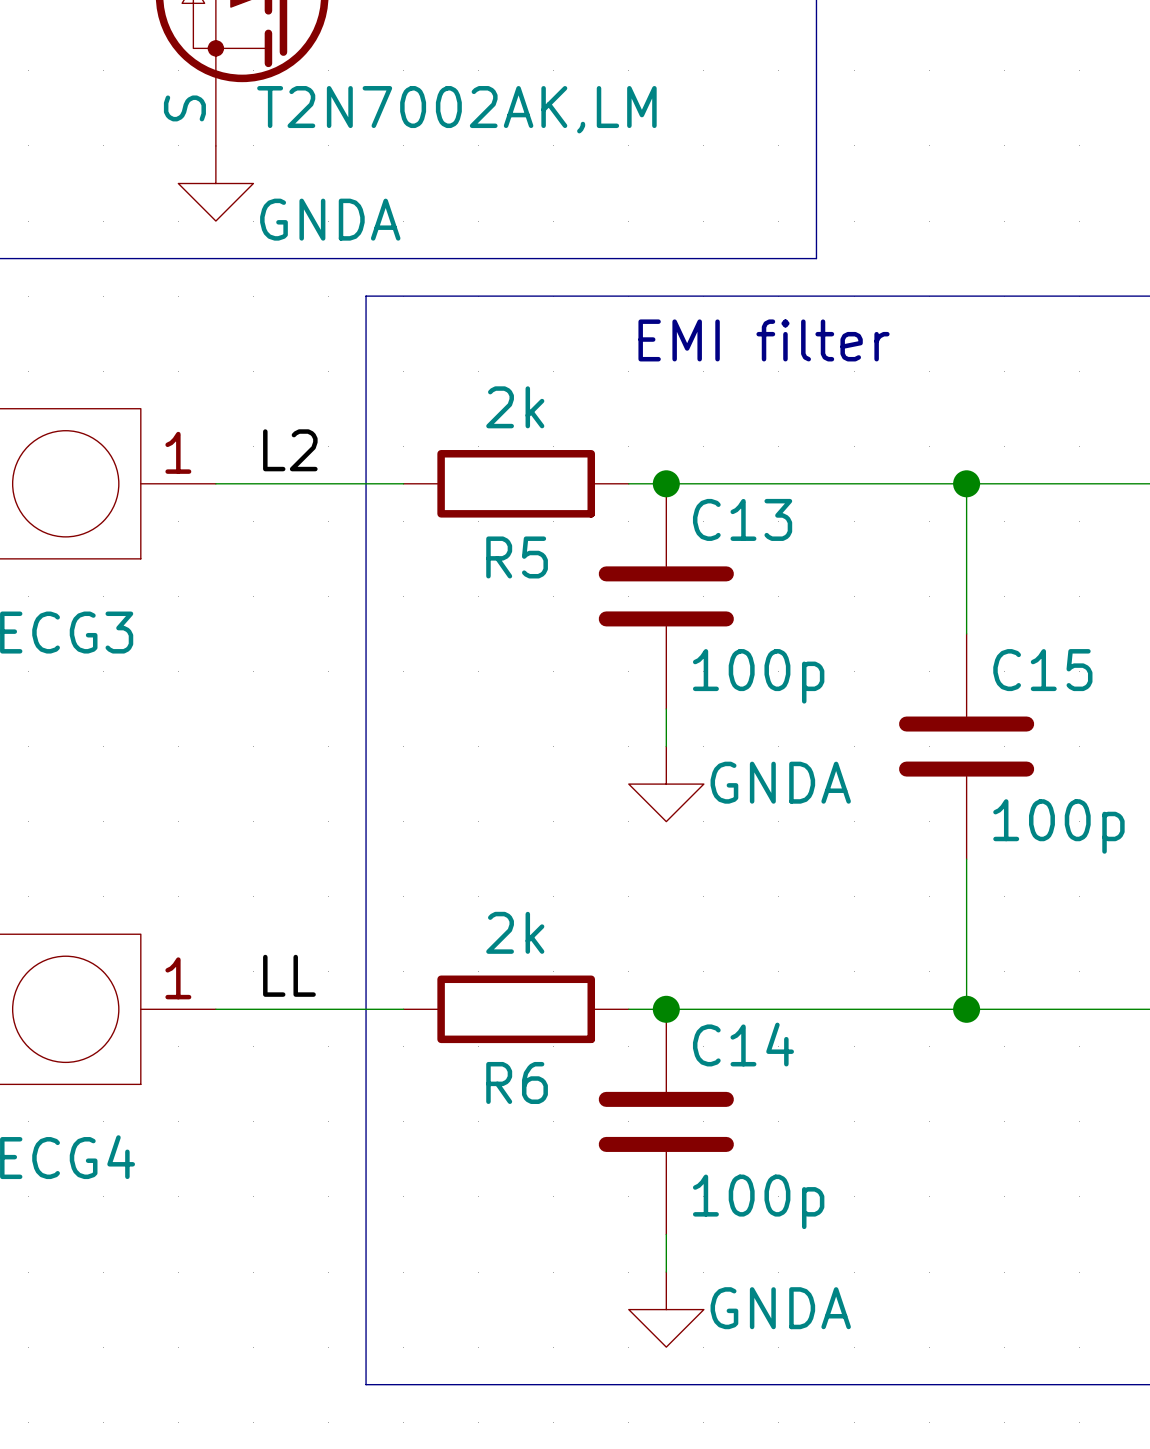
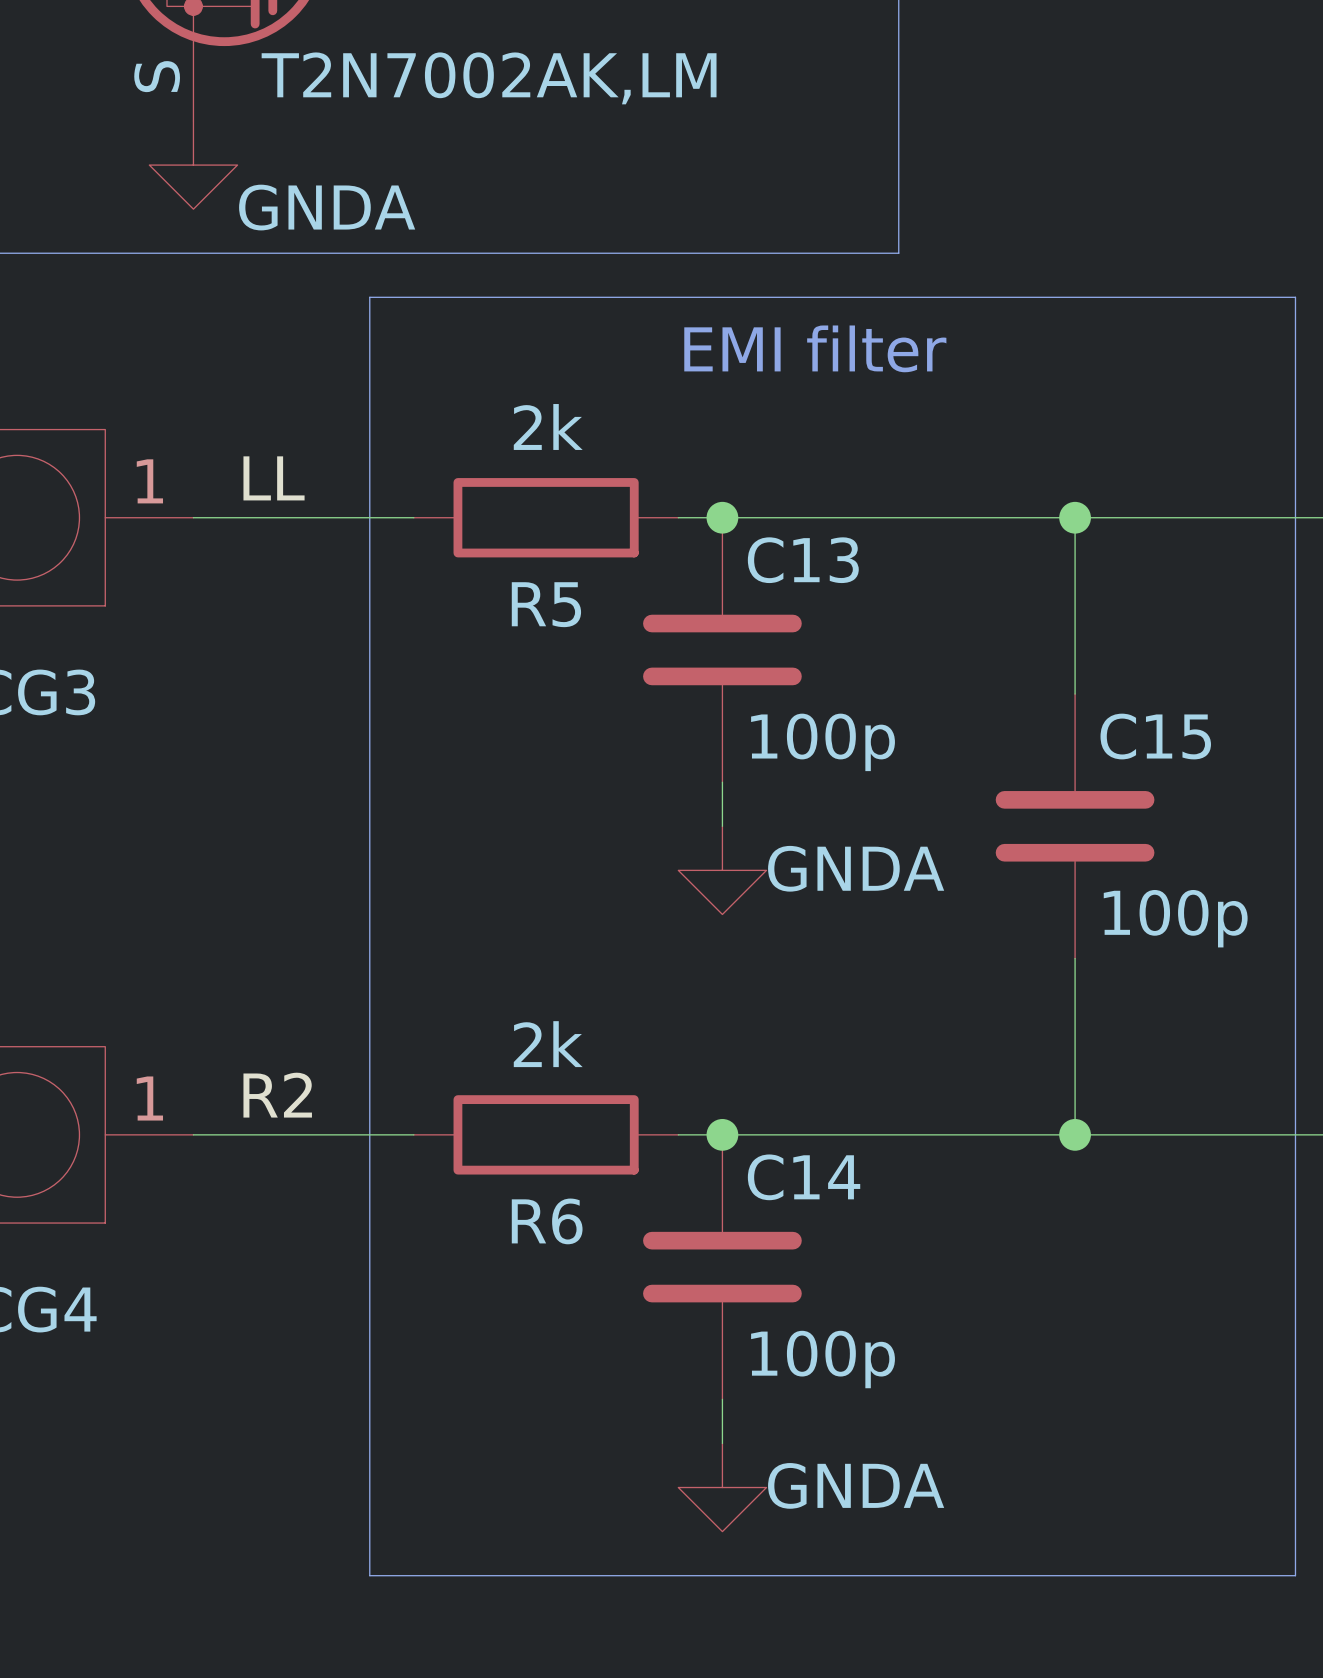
label: L2 (290, 450) -> LL (274, 478)
label: LL (289, 975) -> R2 (277, 1095)

